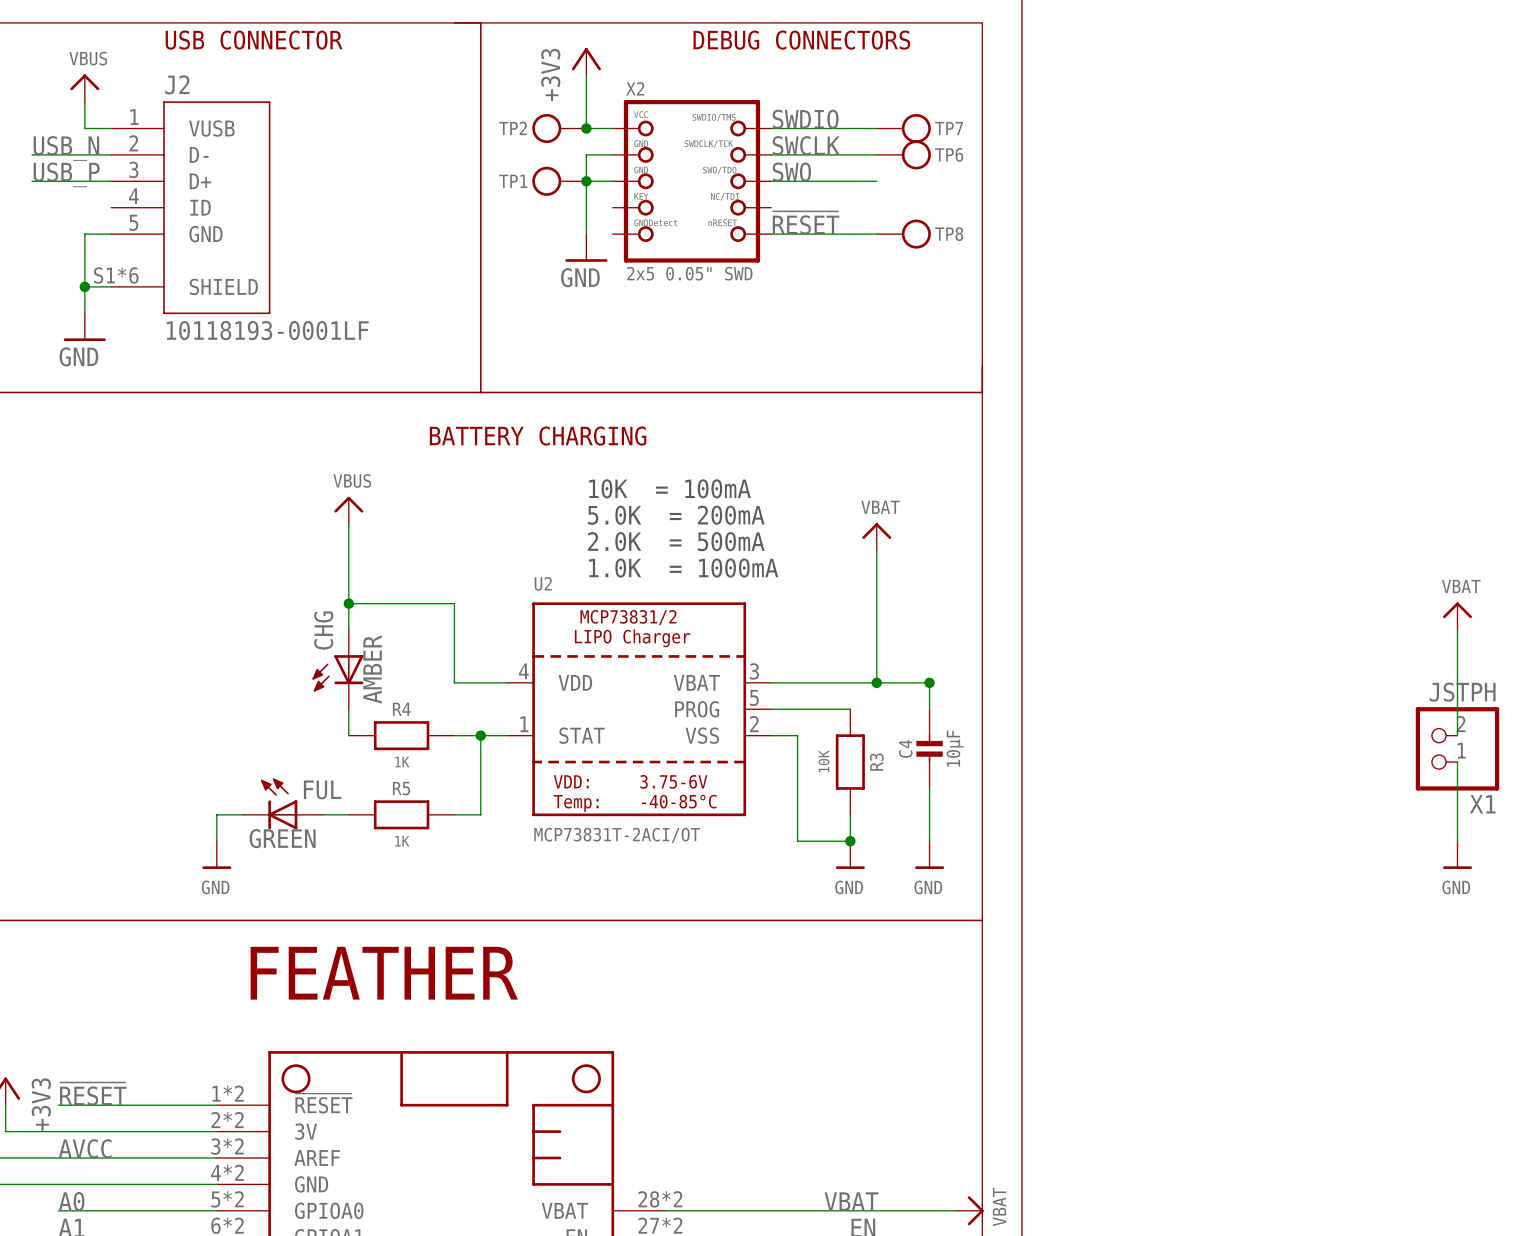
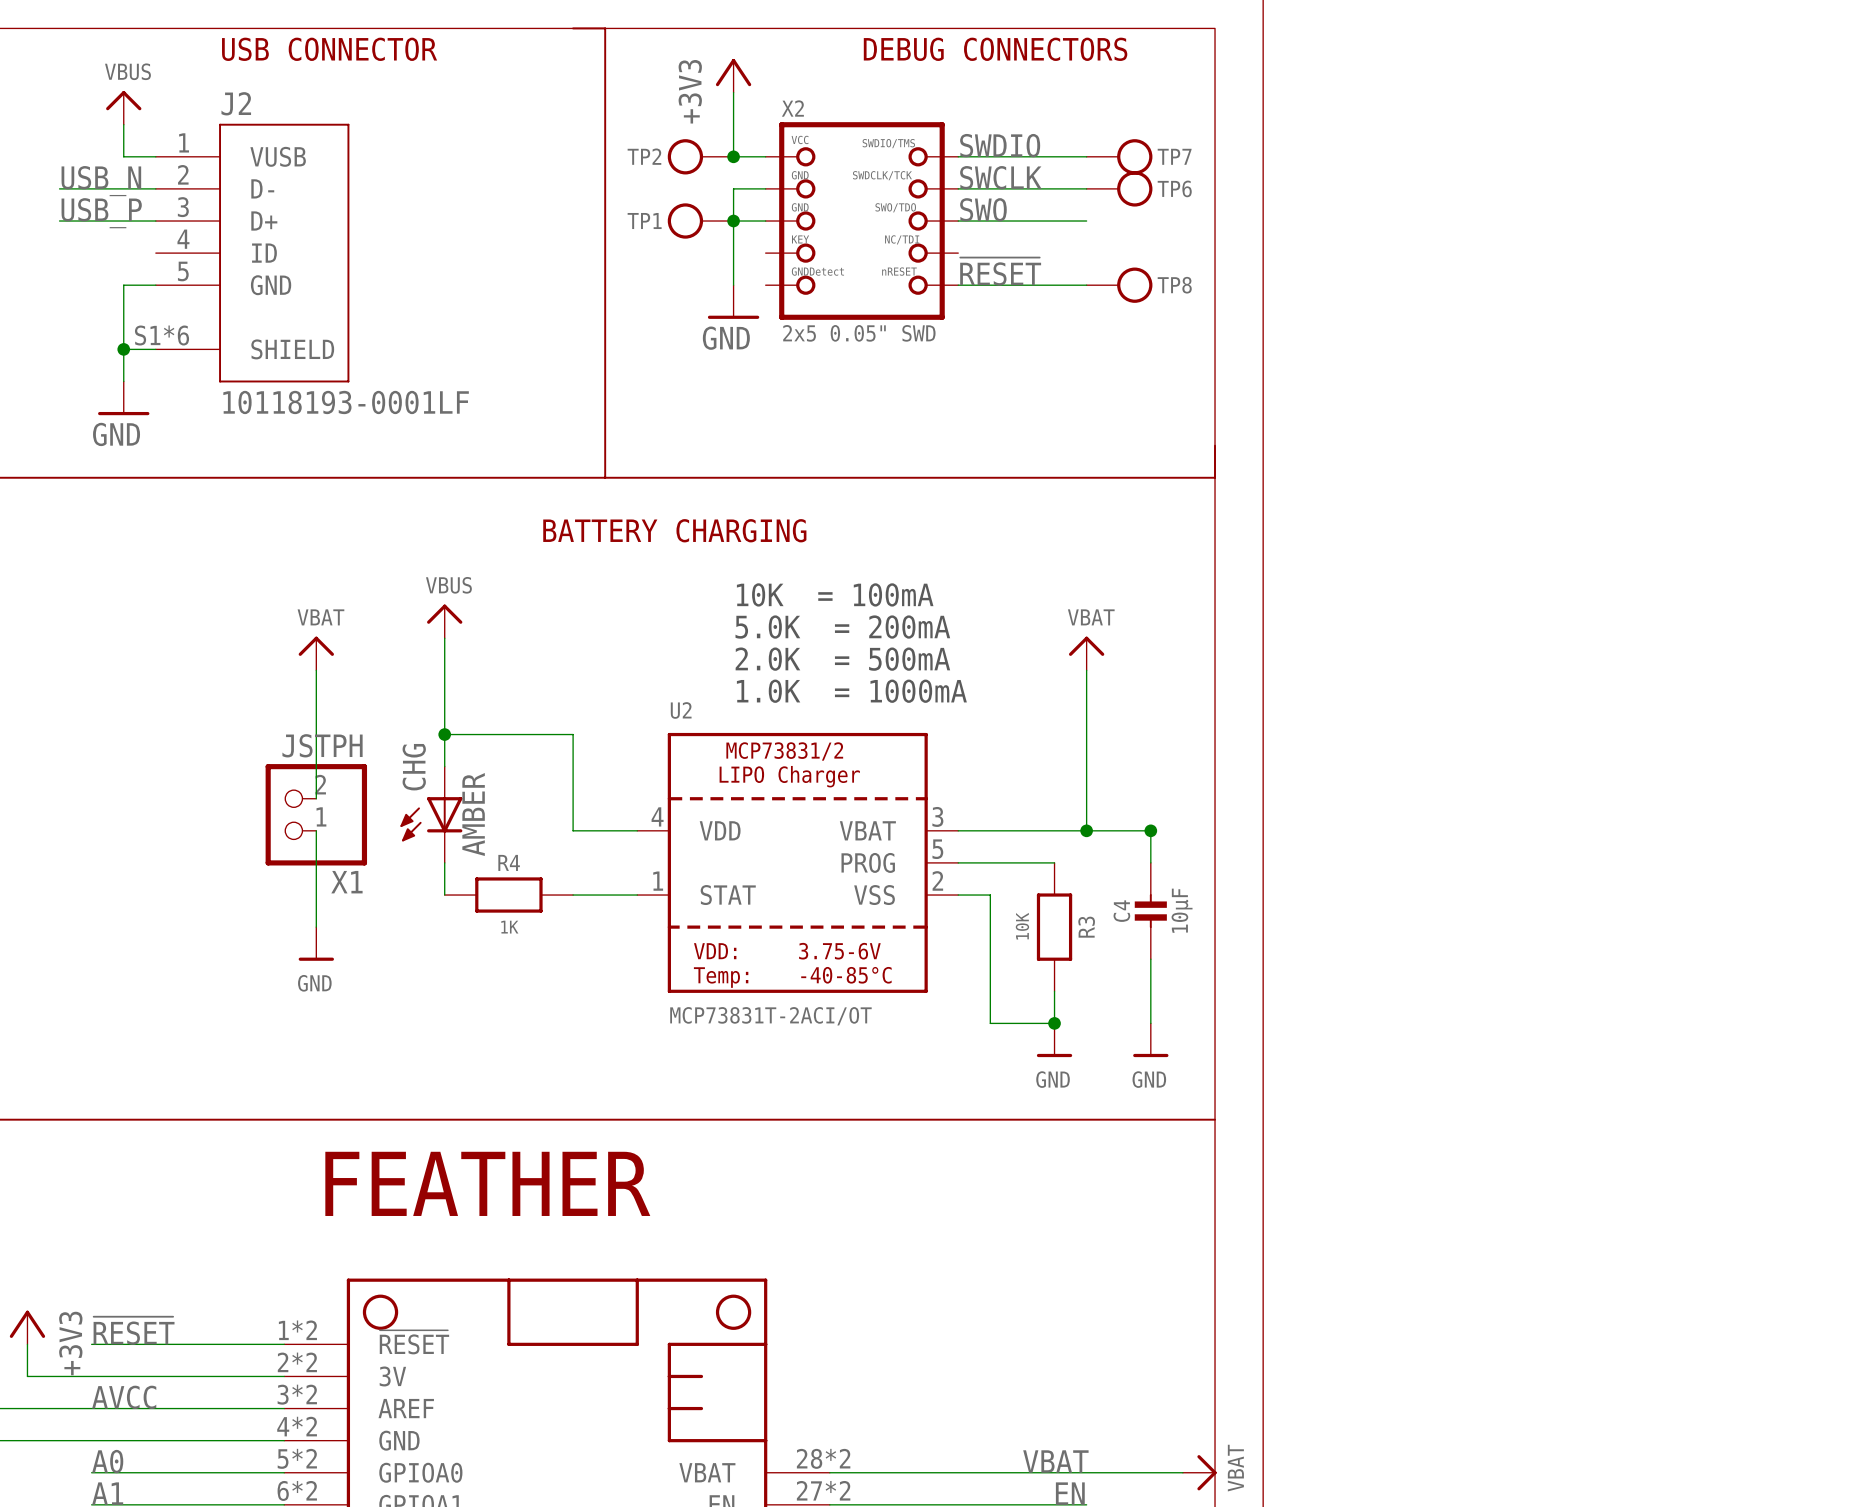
power symbol: none -> VBAT (316, 653)
wire: none -> (316, 670) (316, 798)
power symbol: VBAT (1457, 616) -> none
wire: (1457, 630) (1457, 735) -> none
wire: none -> (316, 830) (316, 927)
wire: (480, 735) (480, 814) (454, 814) -> none
junction: (480, 735) -> none
X1 position: (1457, 748) -> (316, 814)
wire: (1457, 762) (1457, 841) -> none
FUL: GREEN (282, 803) -> none
wire: (243, 814) (216, 814) (216, 841) -> none
wire: (322, 814) (348, 814) -> none
R5: 1K (401, 814) -> none
power symbol position: GND (216, 855) -> GND (316, 943)
power symbol: GND (1457, 855) -> none

